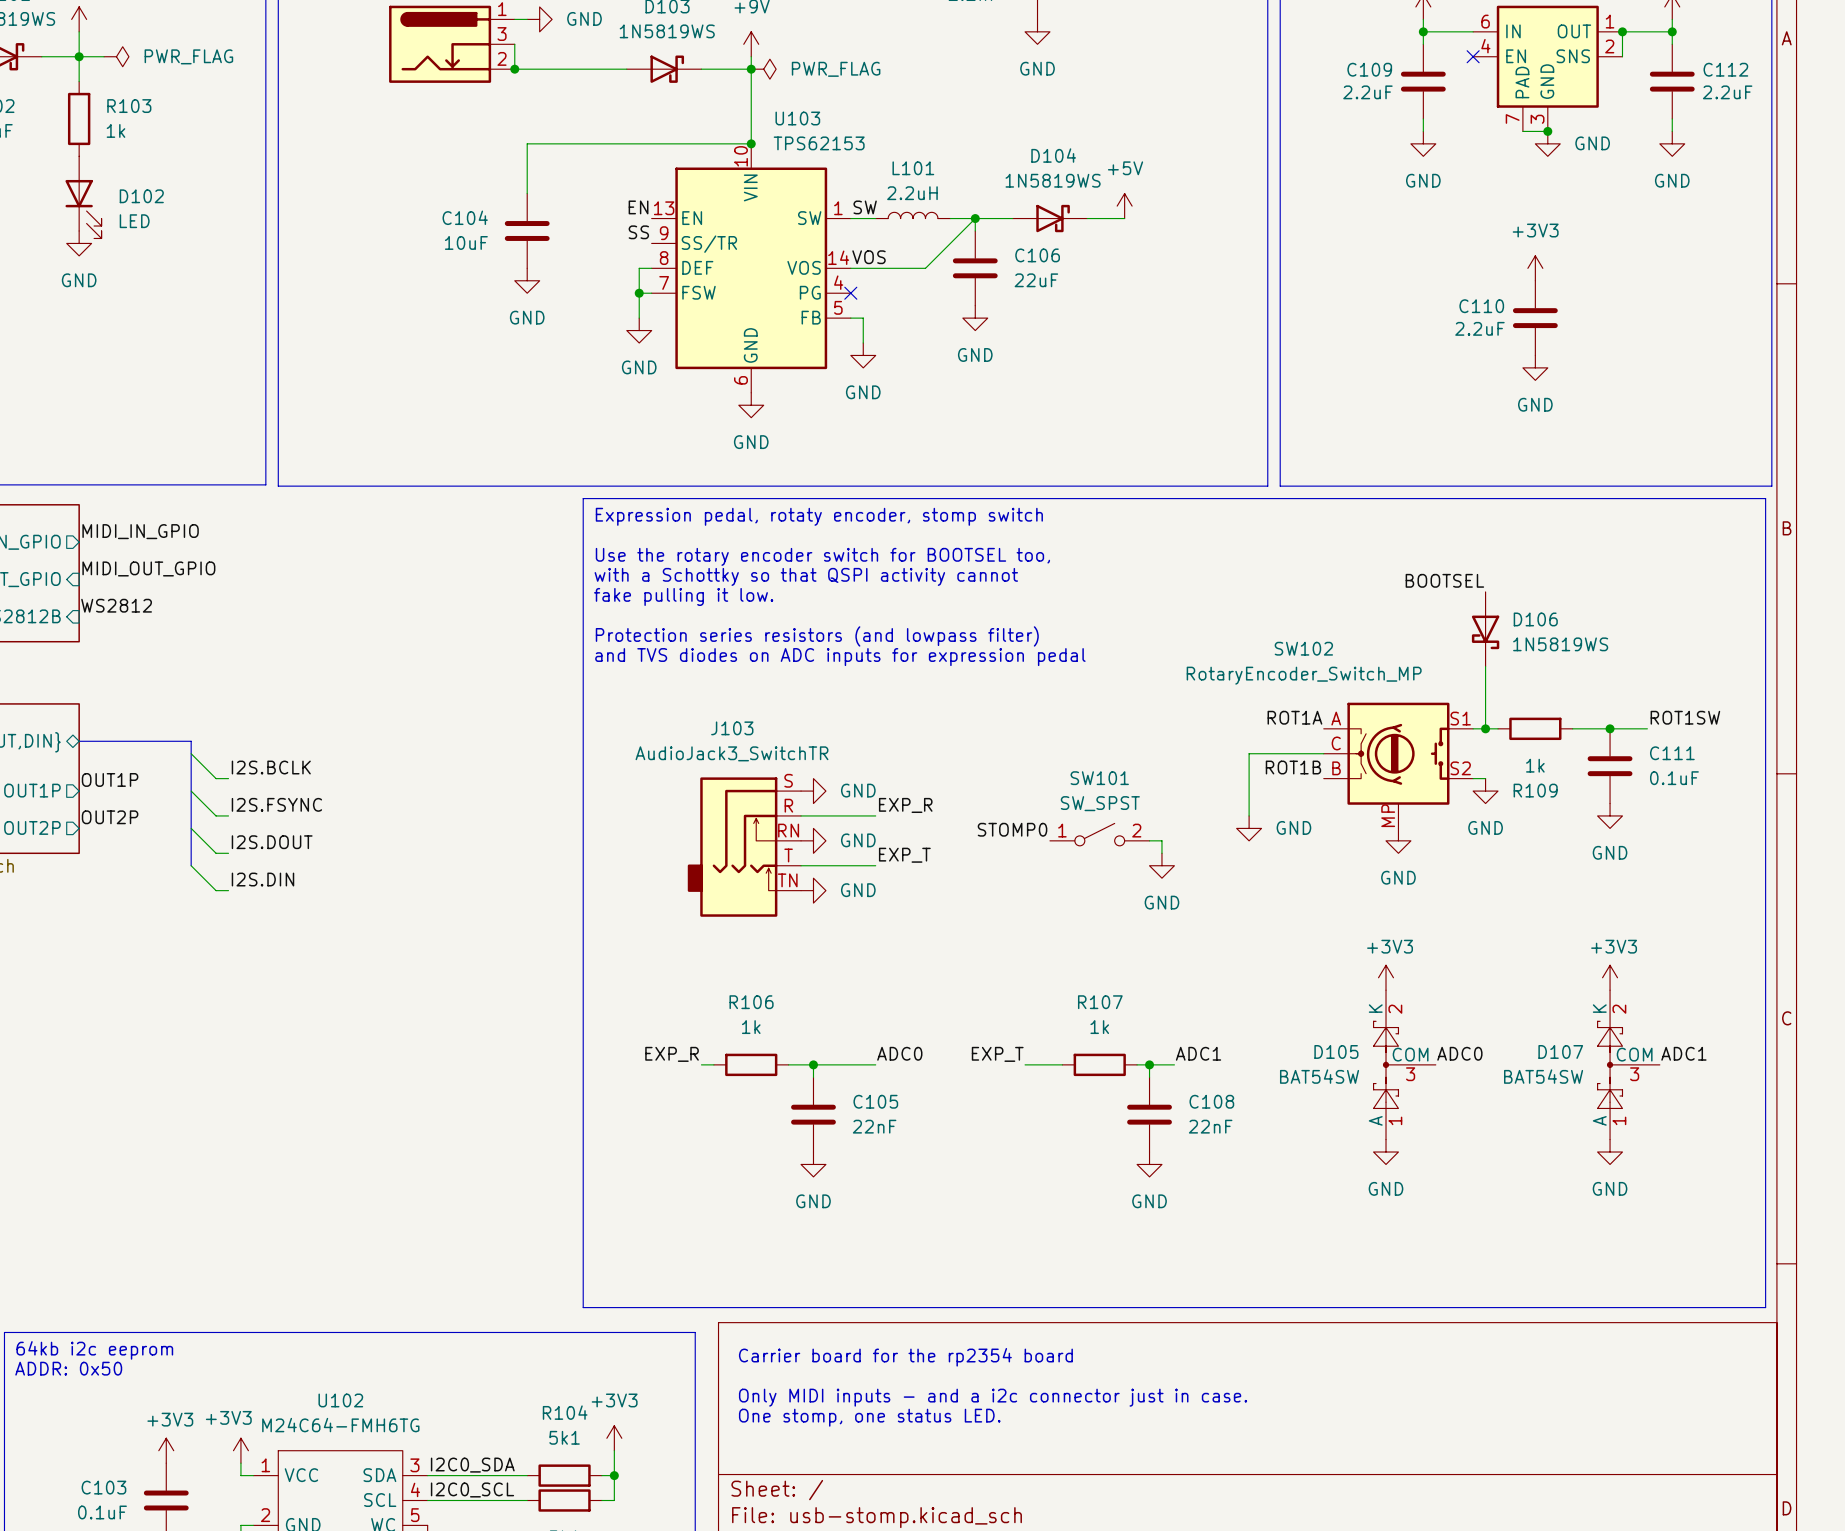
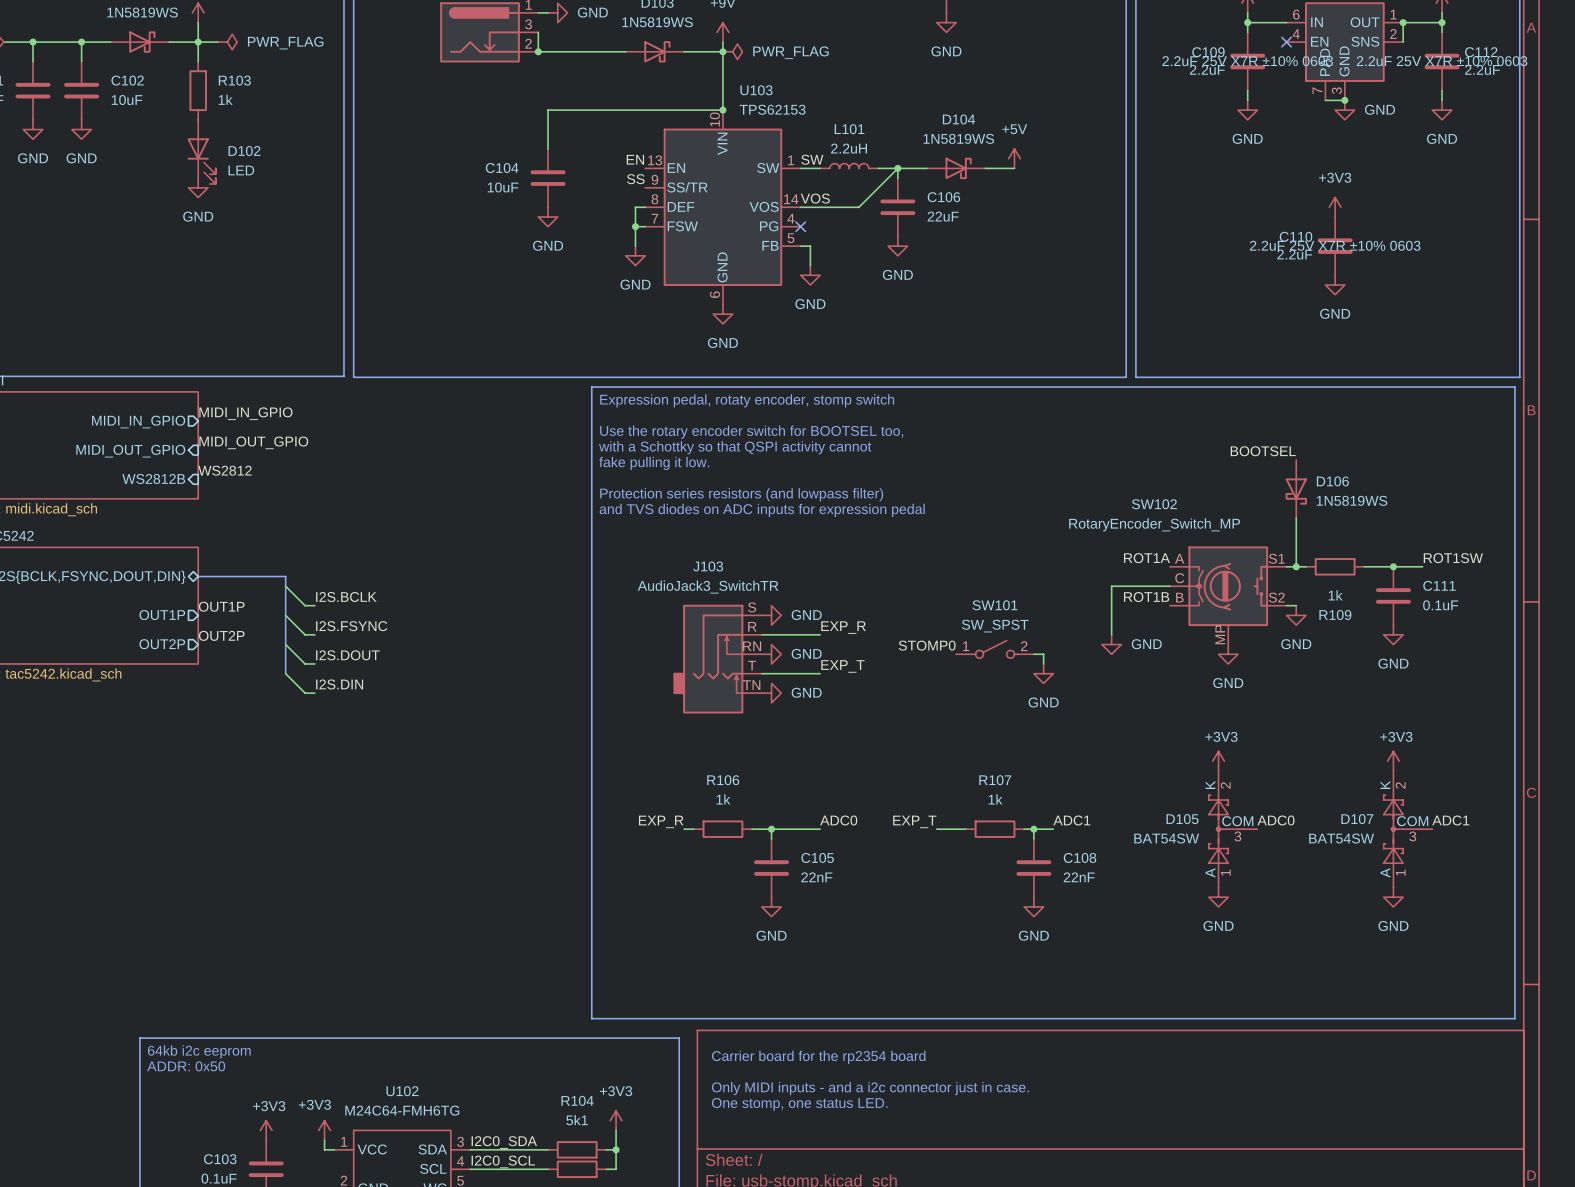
C109 text: none -> 2.2uF 25V X7R ±10% 0603 (1247, 61)
C112 text: none -> 2.2uF 25V X7R ±10% 0603 (1442, 61)
C110 text: none -> 2.2uF 25V X7R ±10% 0603 (1335, 245)

